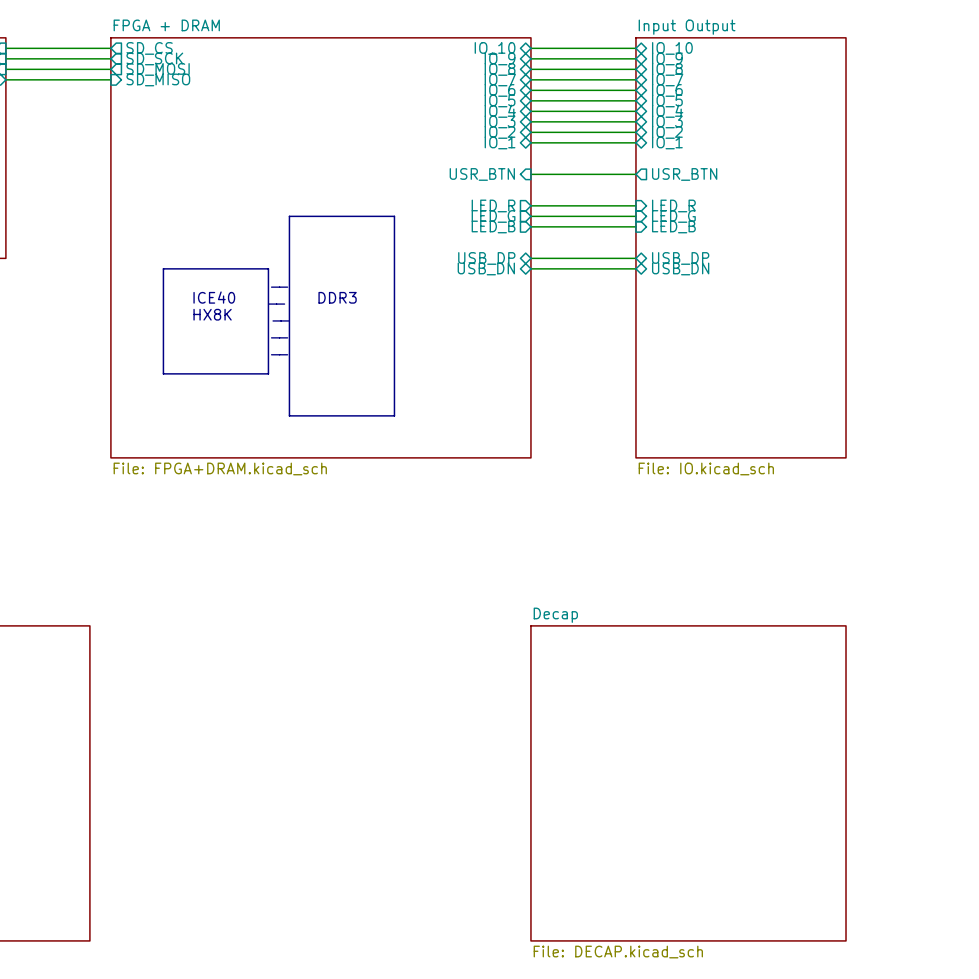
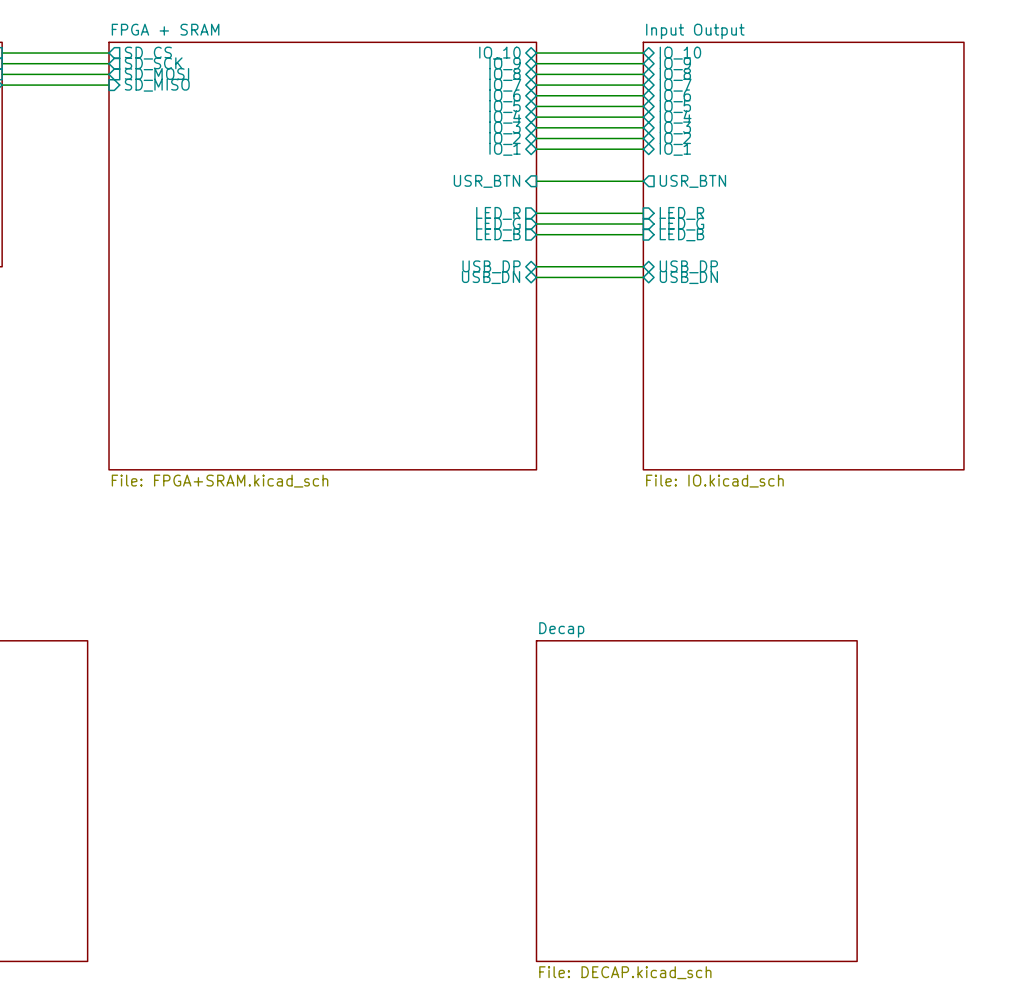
sheet FPGA + DRAM name: FPGA + DRAM (166, 25) -> FPGA + SRAM (165, 29)
line: (289, 216) (394, 216) (394, 415) (289, 415) (289, 216) -> none
sheet Input Output: File: IO.kicad_sch (740, 247) -> none
sheet Input Output: none -> File: IO.kicad_sch (803, 256)
line: (163, 268) (268, 268) (268, 373) (163, 373) (163, 268) -> none
text: __ (279, 287) -> none
text: ICE40 __ DDR3 (275, 298) -> none
text: HX8K __ (241, 315) -> none
text: __ (279, 337) -> none
text: __ (279, 354) -> none
sheet FPGA + DRAM value: File: FPGA+DRAM.kicad_sch (220, 468) -> File: FPGA+SRAM.kicad_sch (220, 481)

